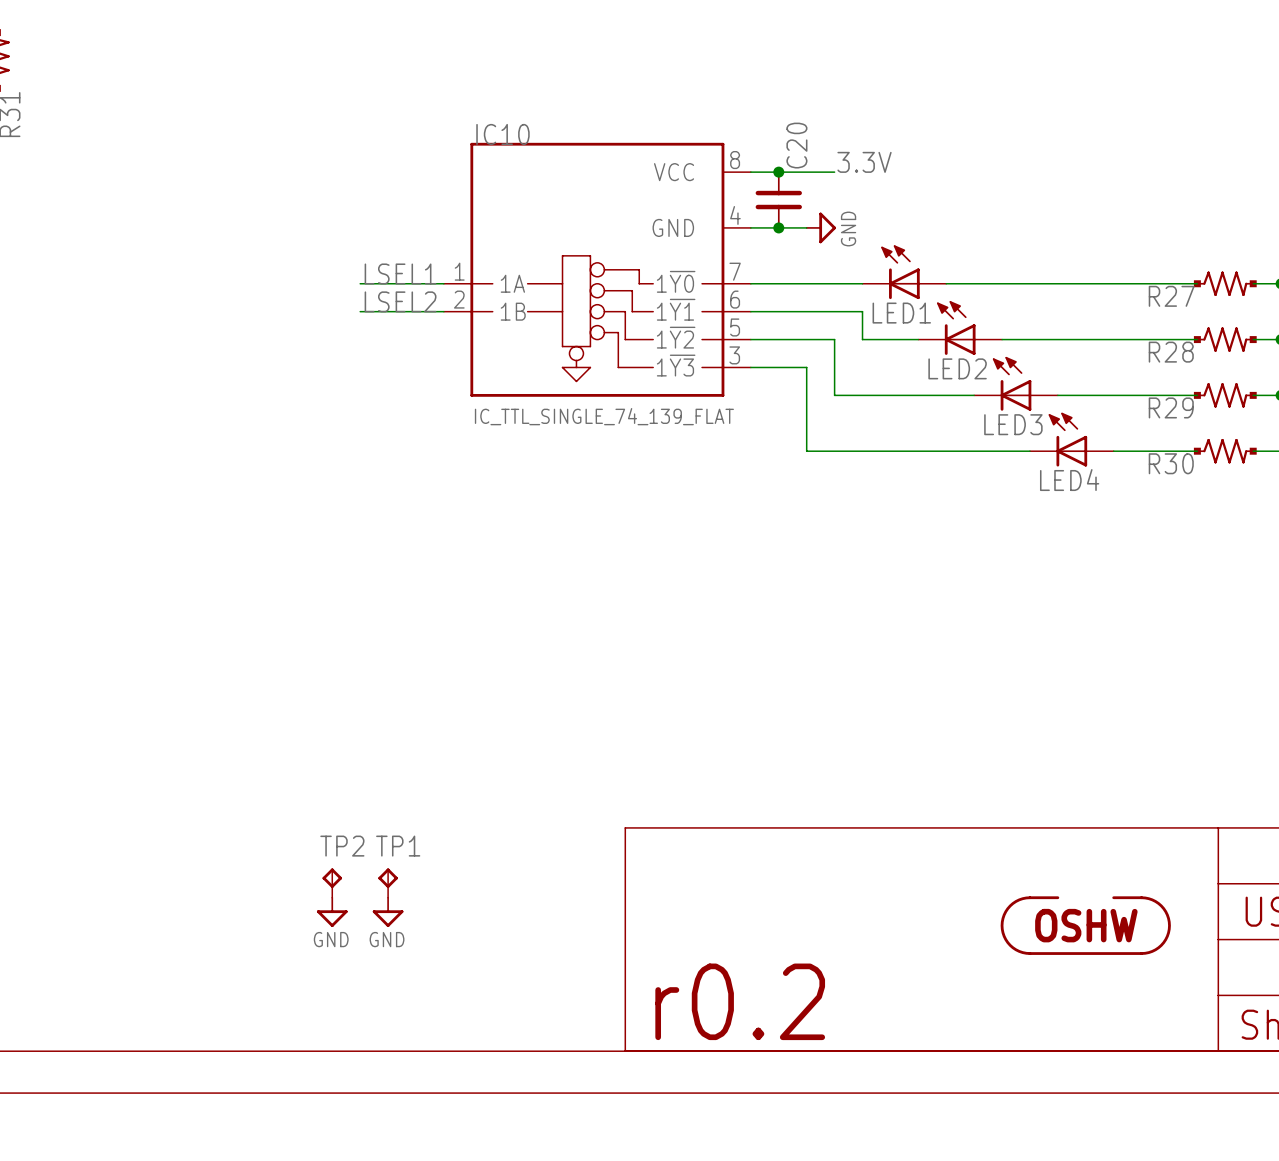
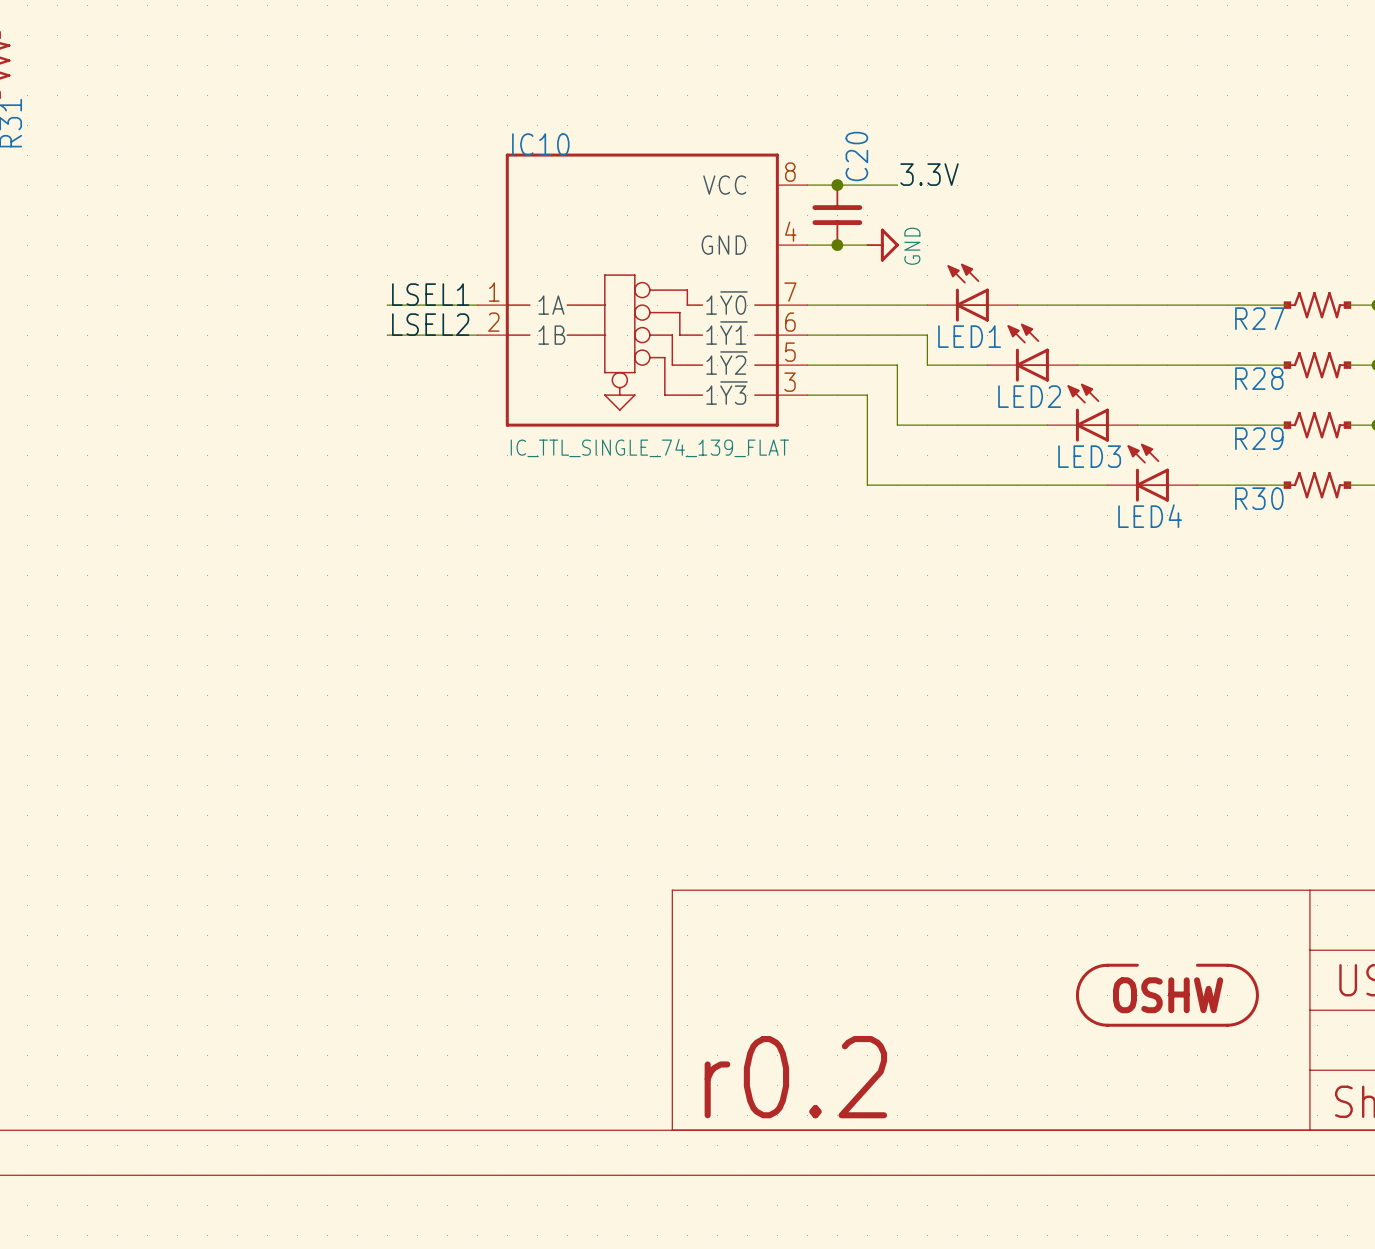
TP2: (332, 883) -> none
TP1: (388, 883) -> none
power symbol: GND (332, 911) -> none
power symbol: GND (388, 911) -> none

